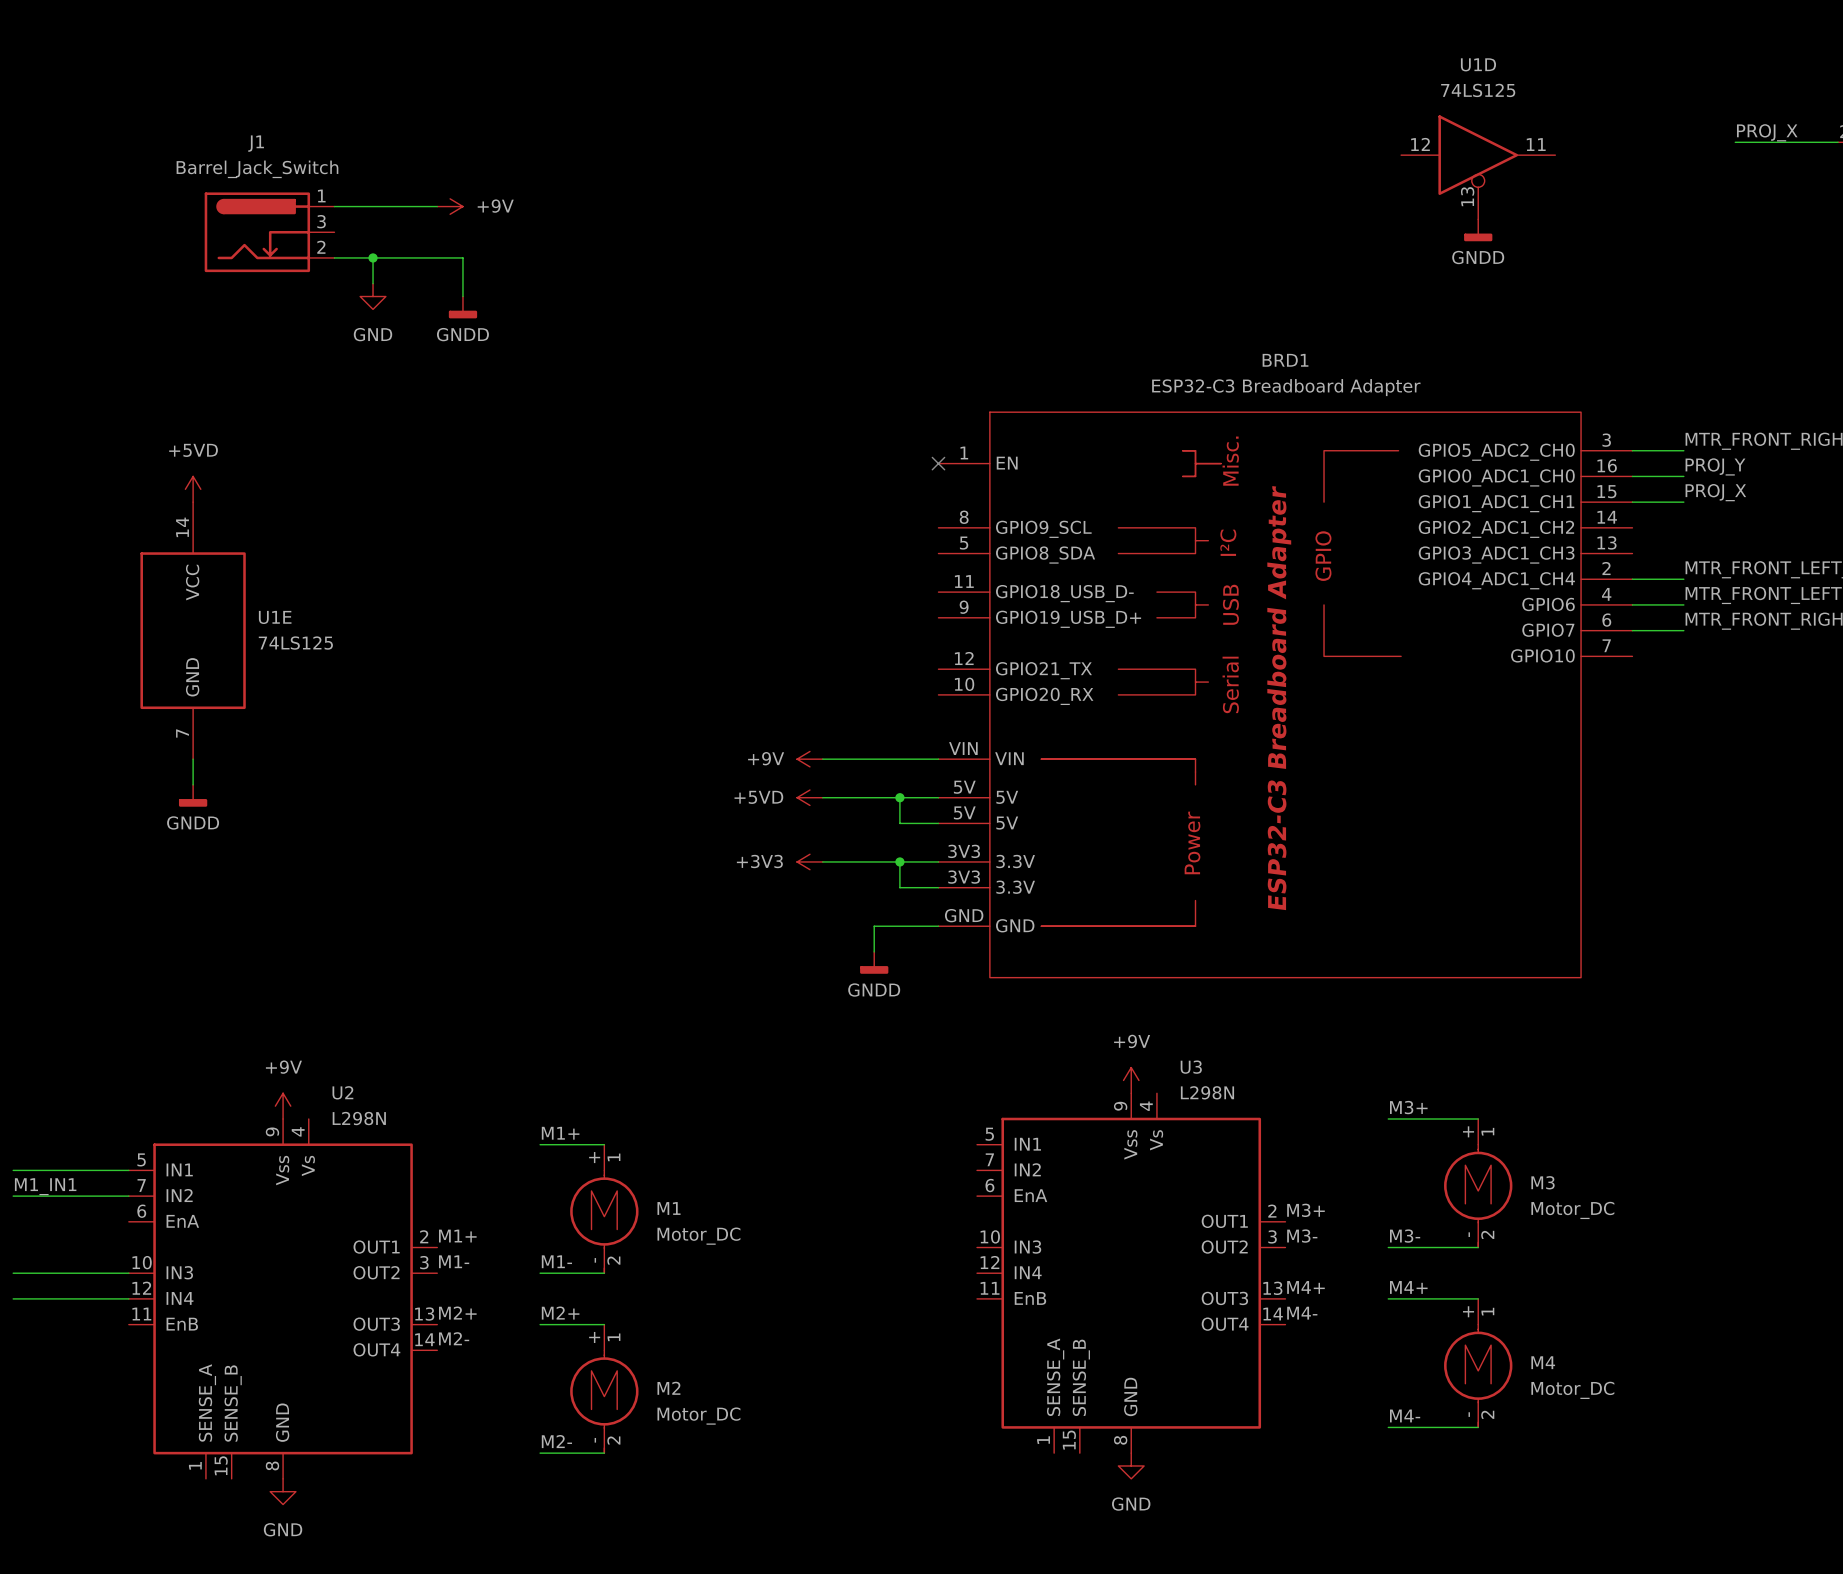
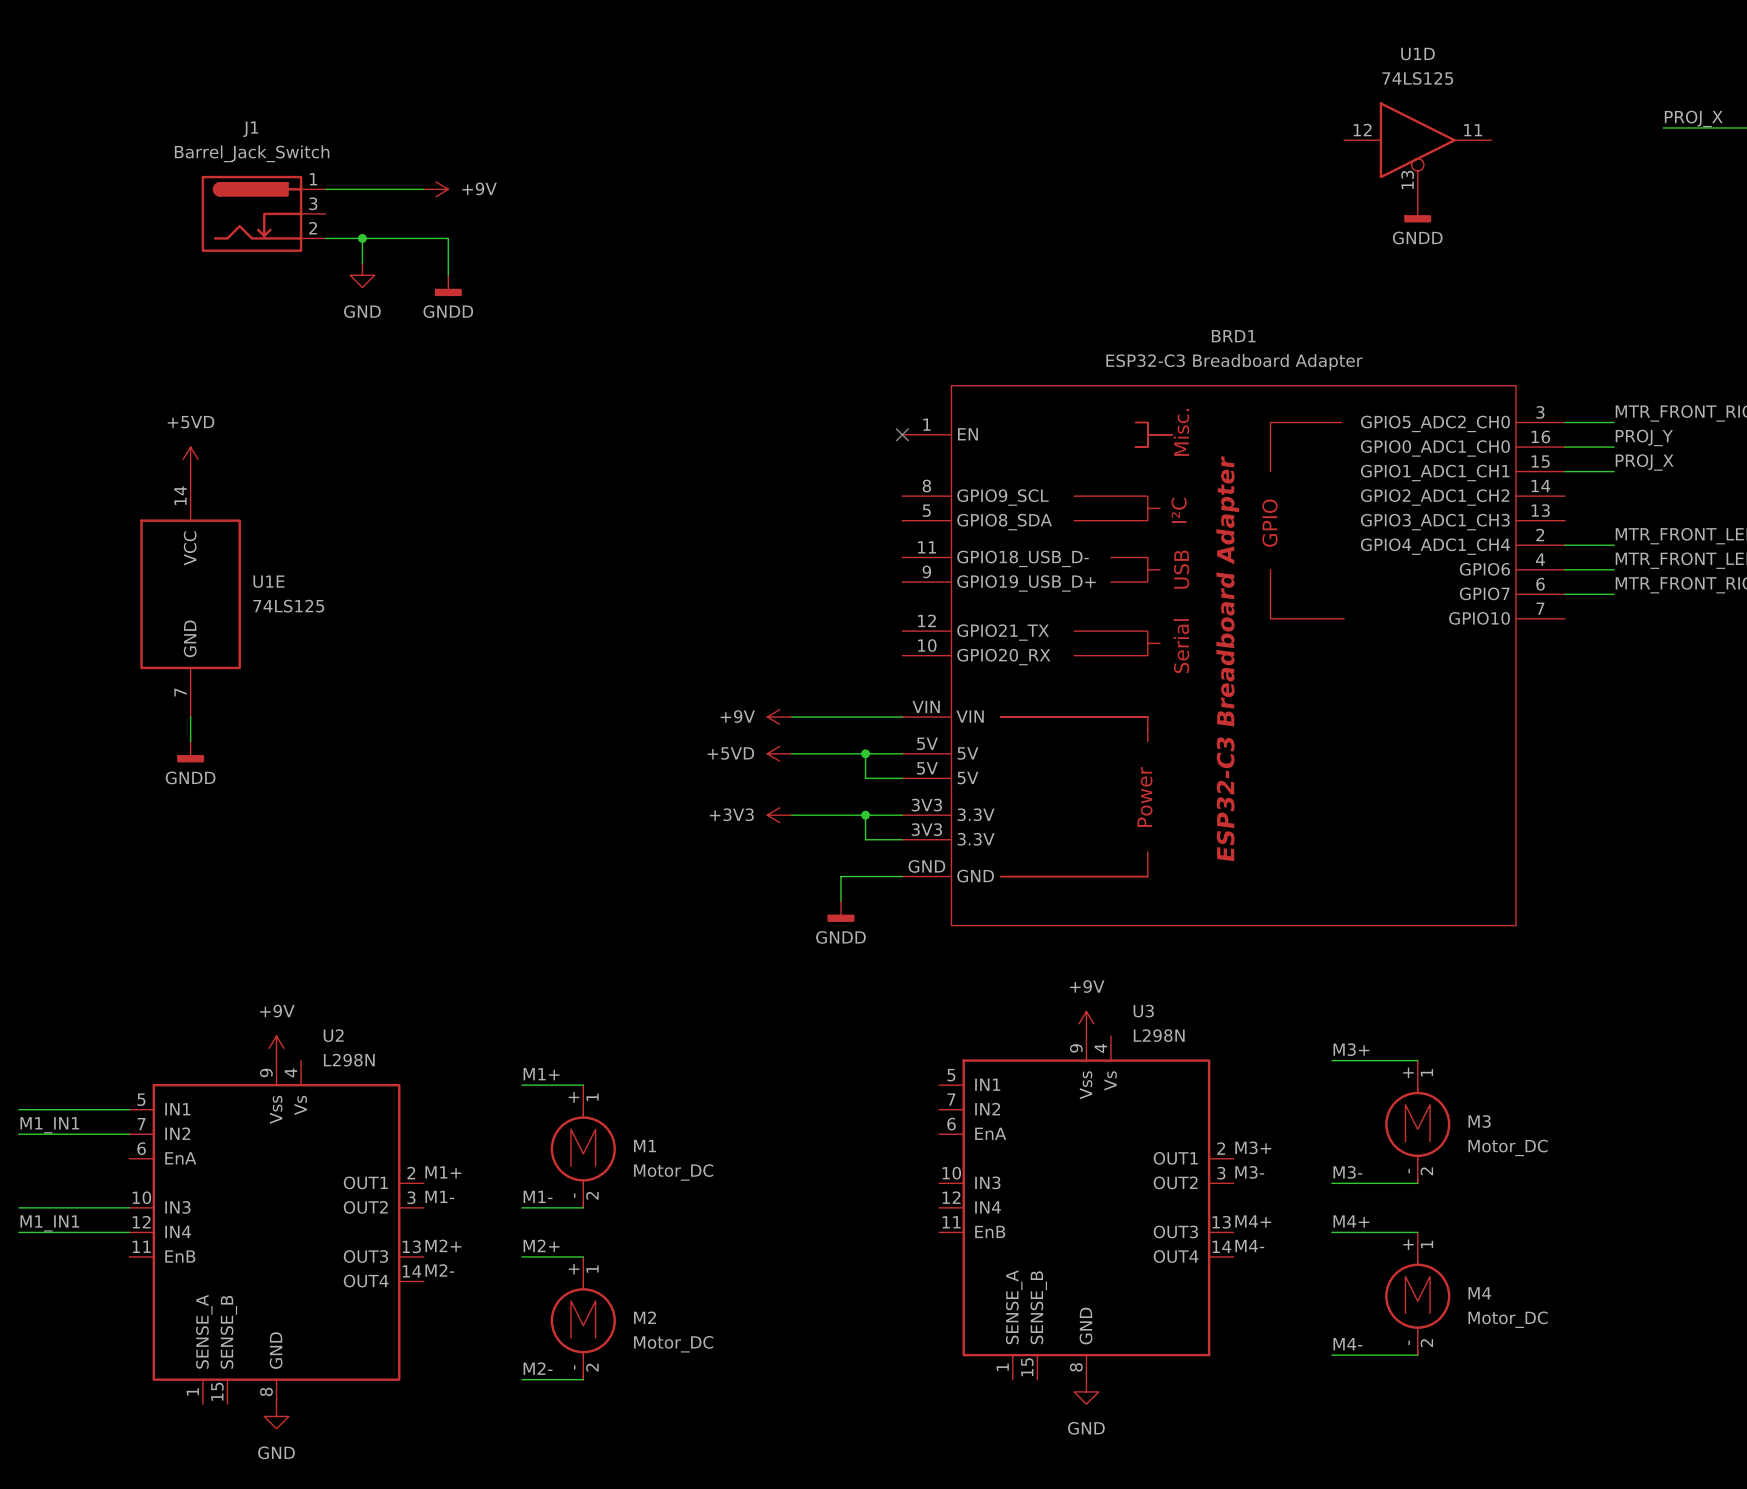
label: none -> M1_IN1 (49, 1223)

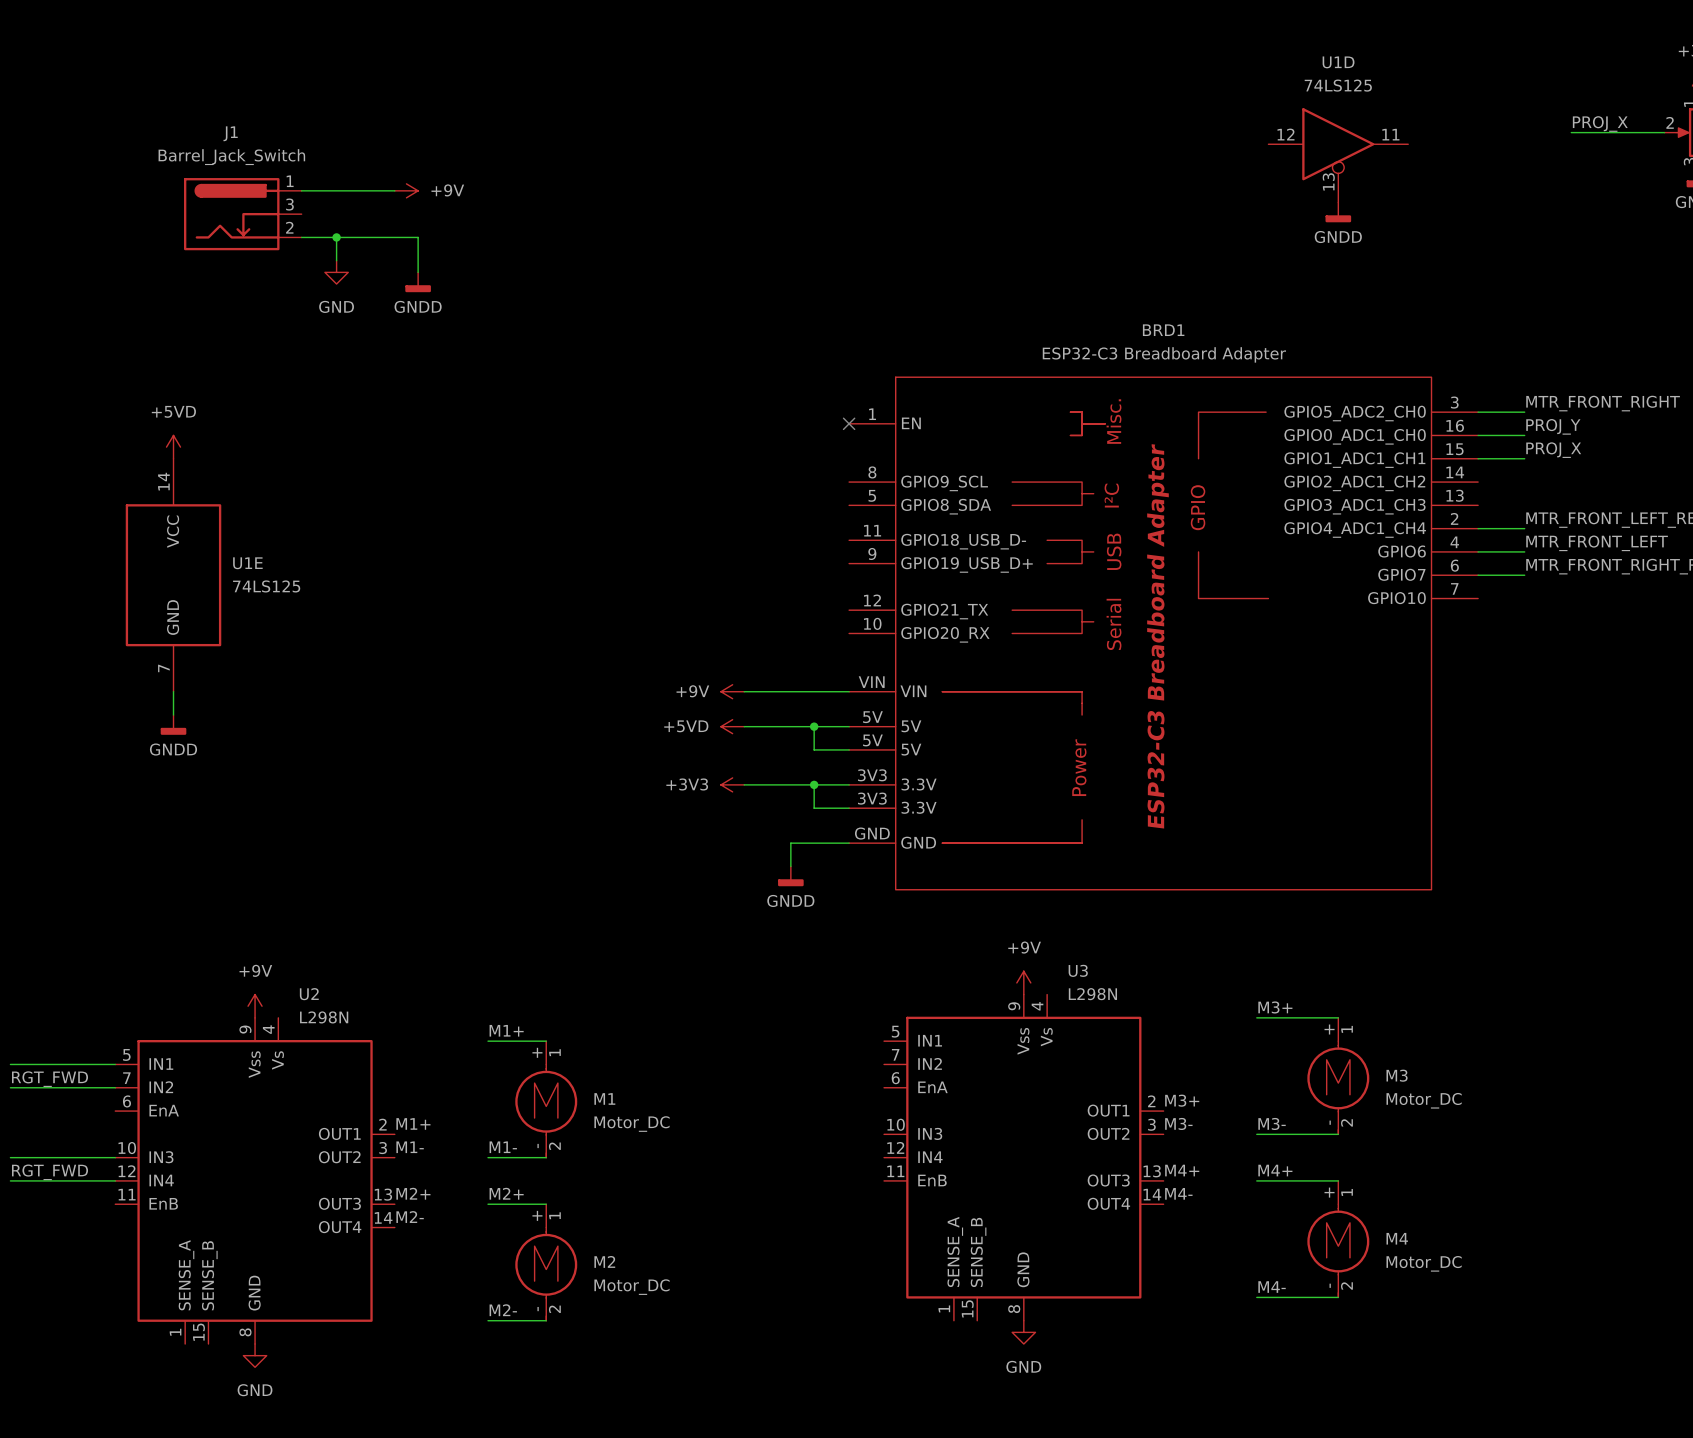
label: M1_IN1 (49, 1125) -> RGT_FWD (50, 1079)
label: M1_IN1 (49, 1223) -> RGT_FWD (50, 1172)

